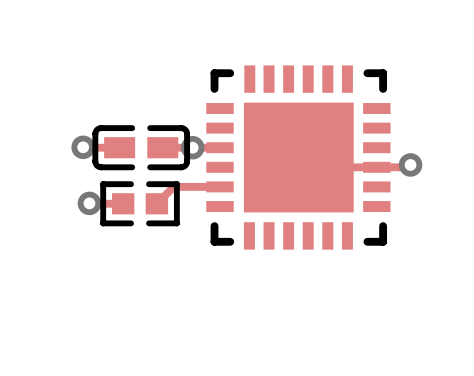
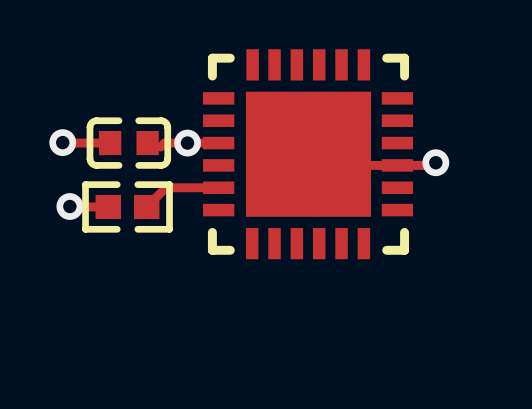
part footprint: [92, 125, 191, 171] -> [86, 117, 172, 169]

